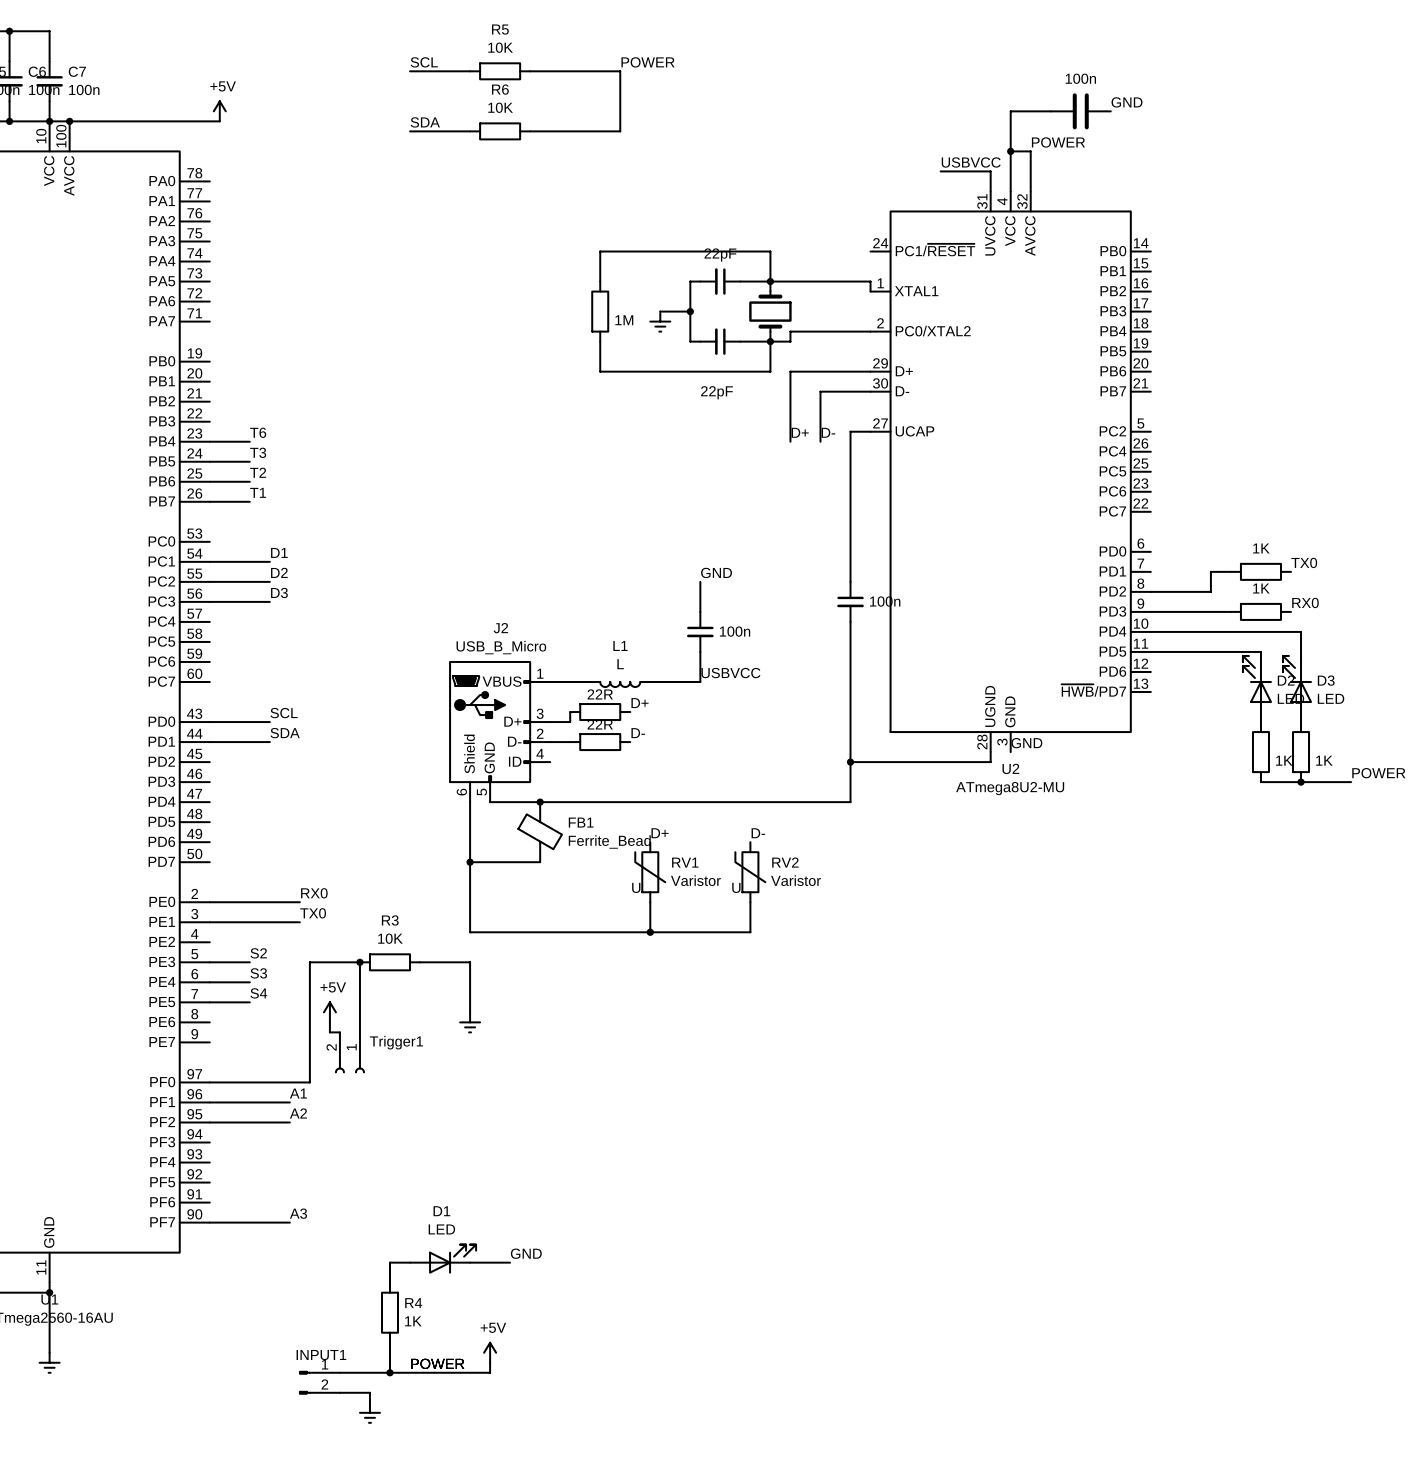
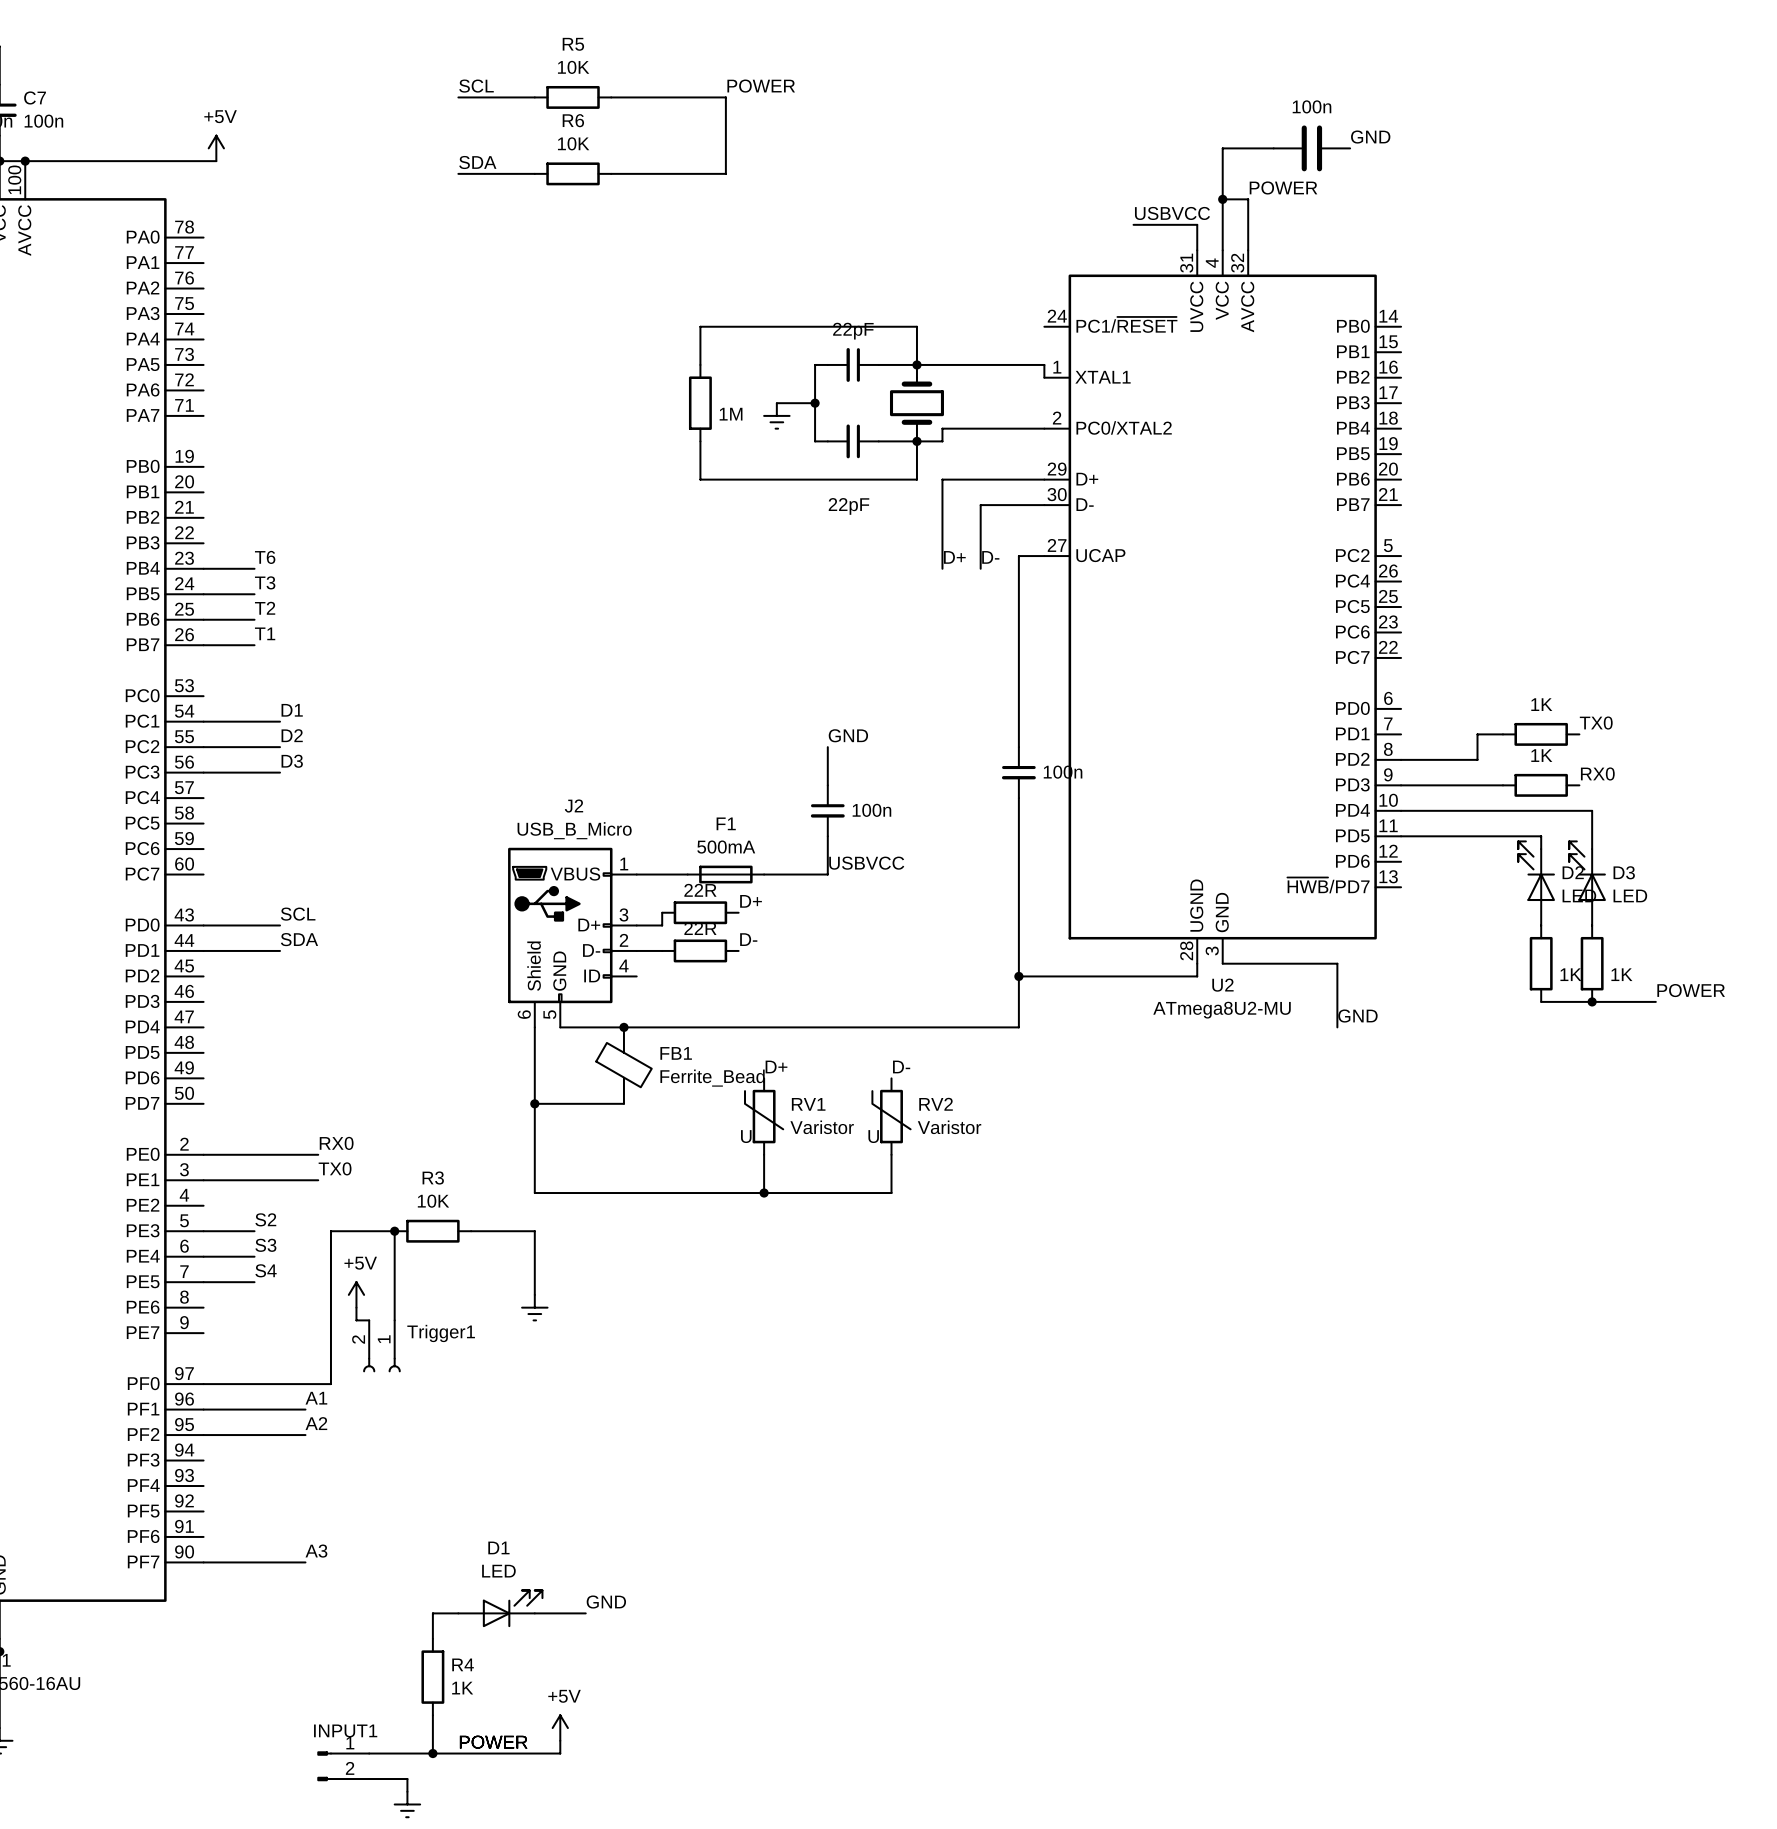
F1: none -> 500mA (725, 874)
L1: L (620, 684) -> none
label position: GND (1026, 743) -> GND (1357, 1016)
wire: none -> (1222, 963) (1337, 963) (1337, 1027)

